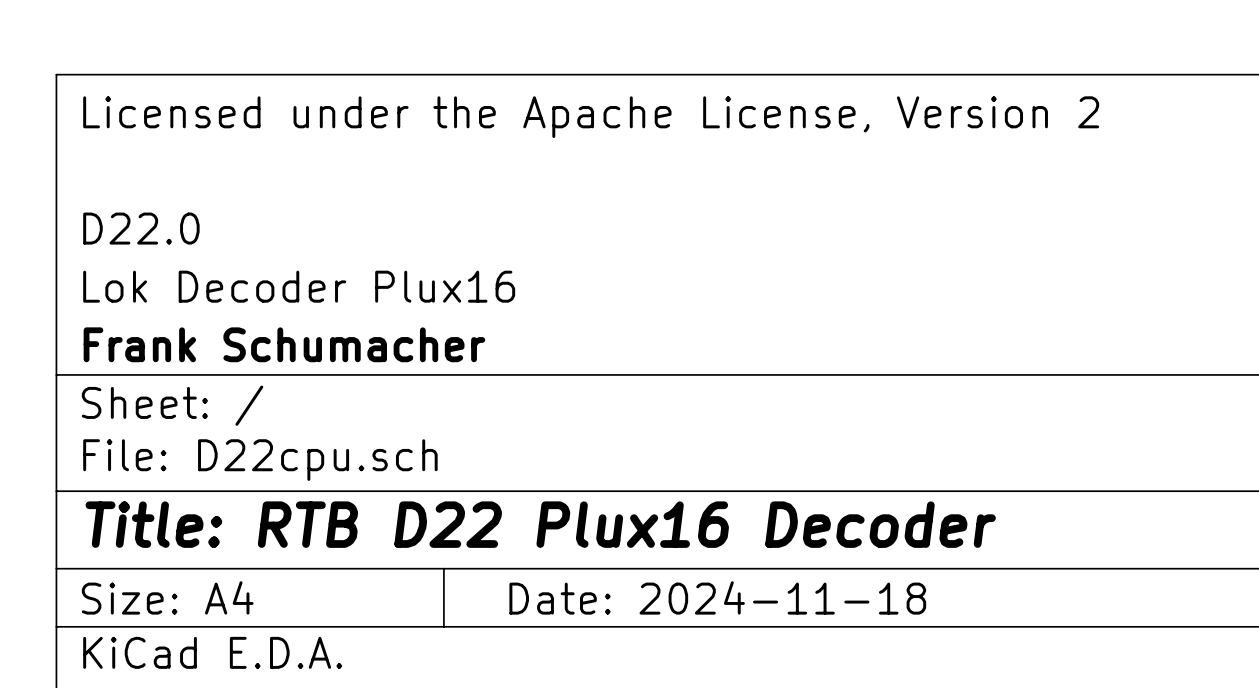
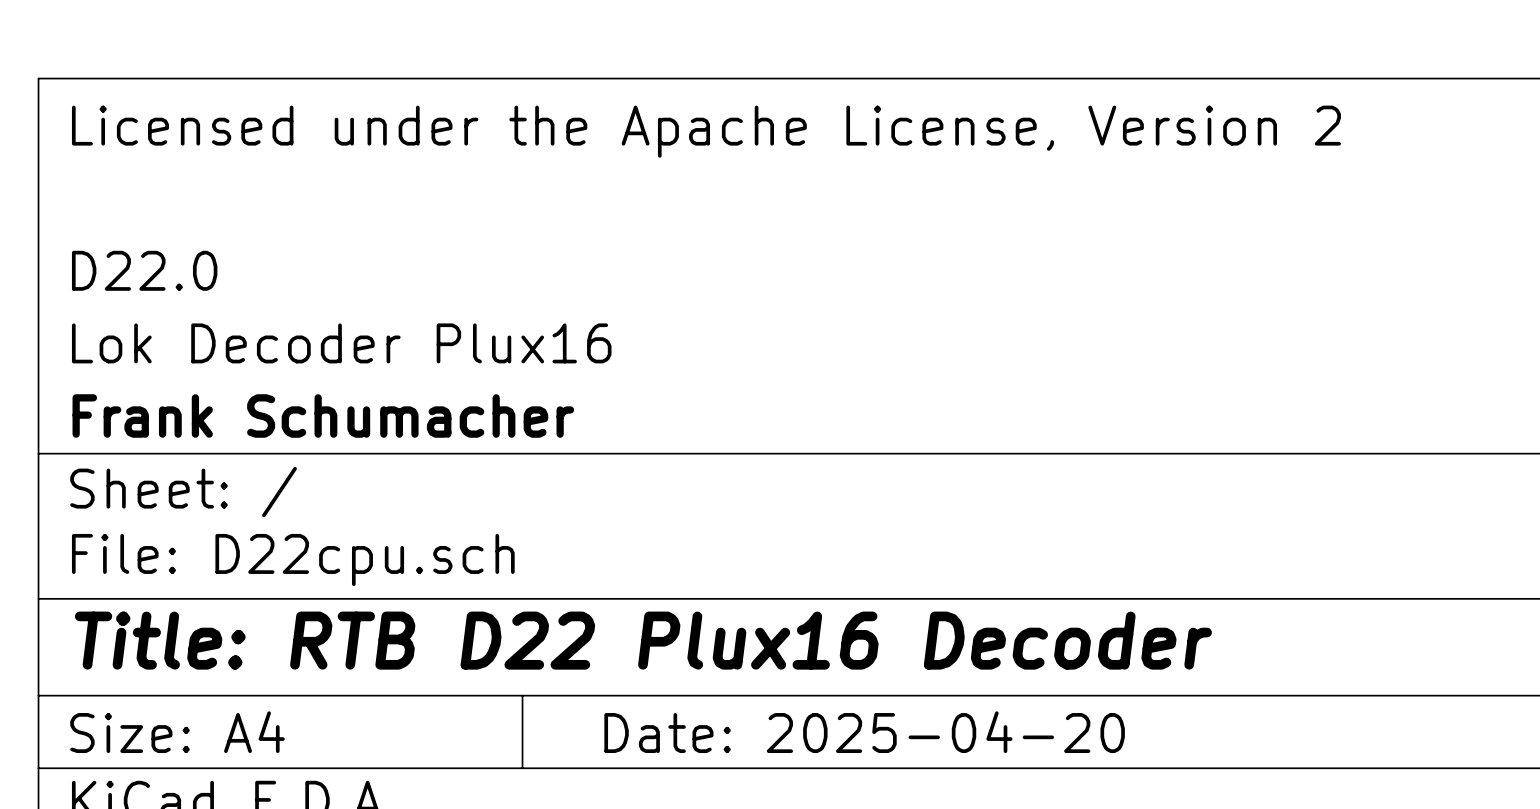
title block: Date: 2024-11-18 (717, 597) -> Date: 2025-04-20 (864, 732)

